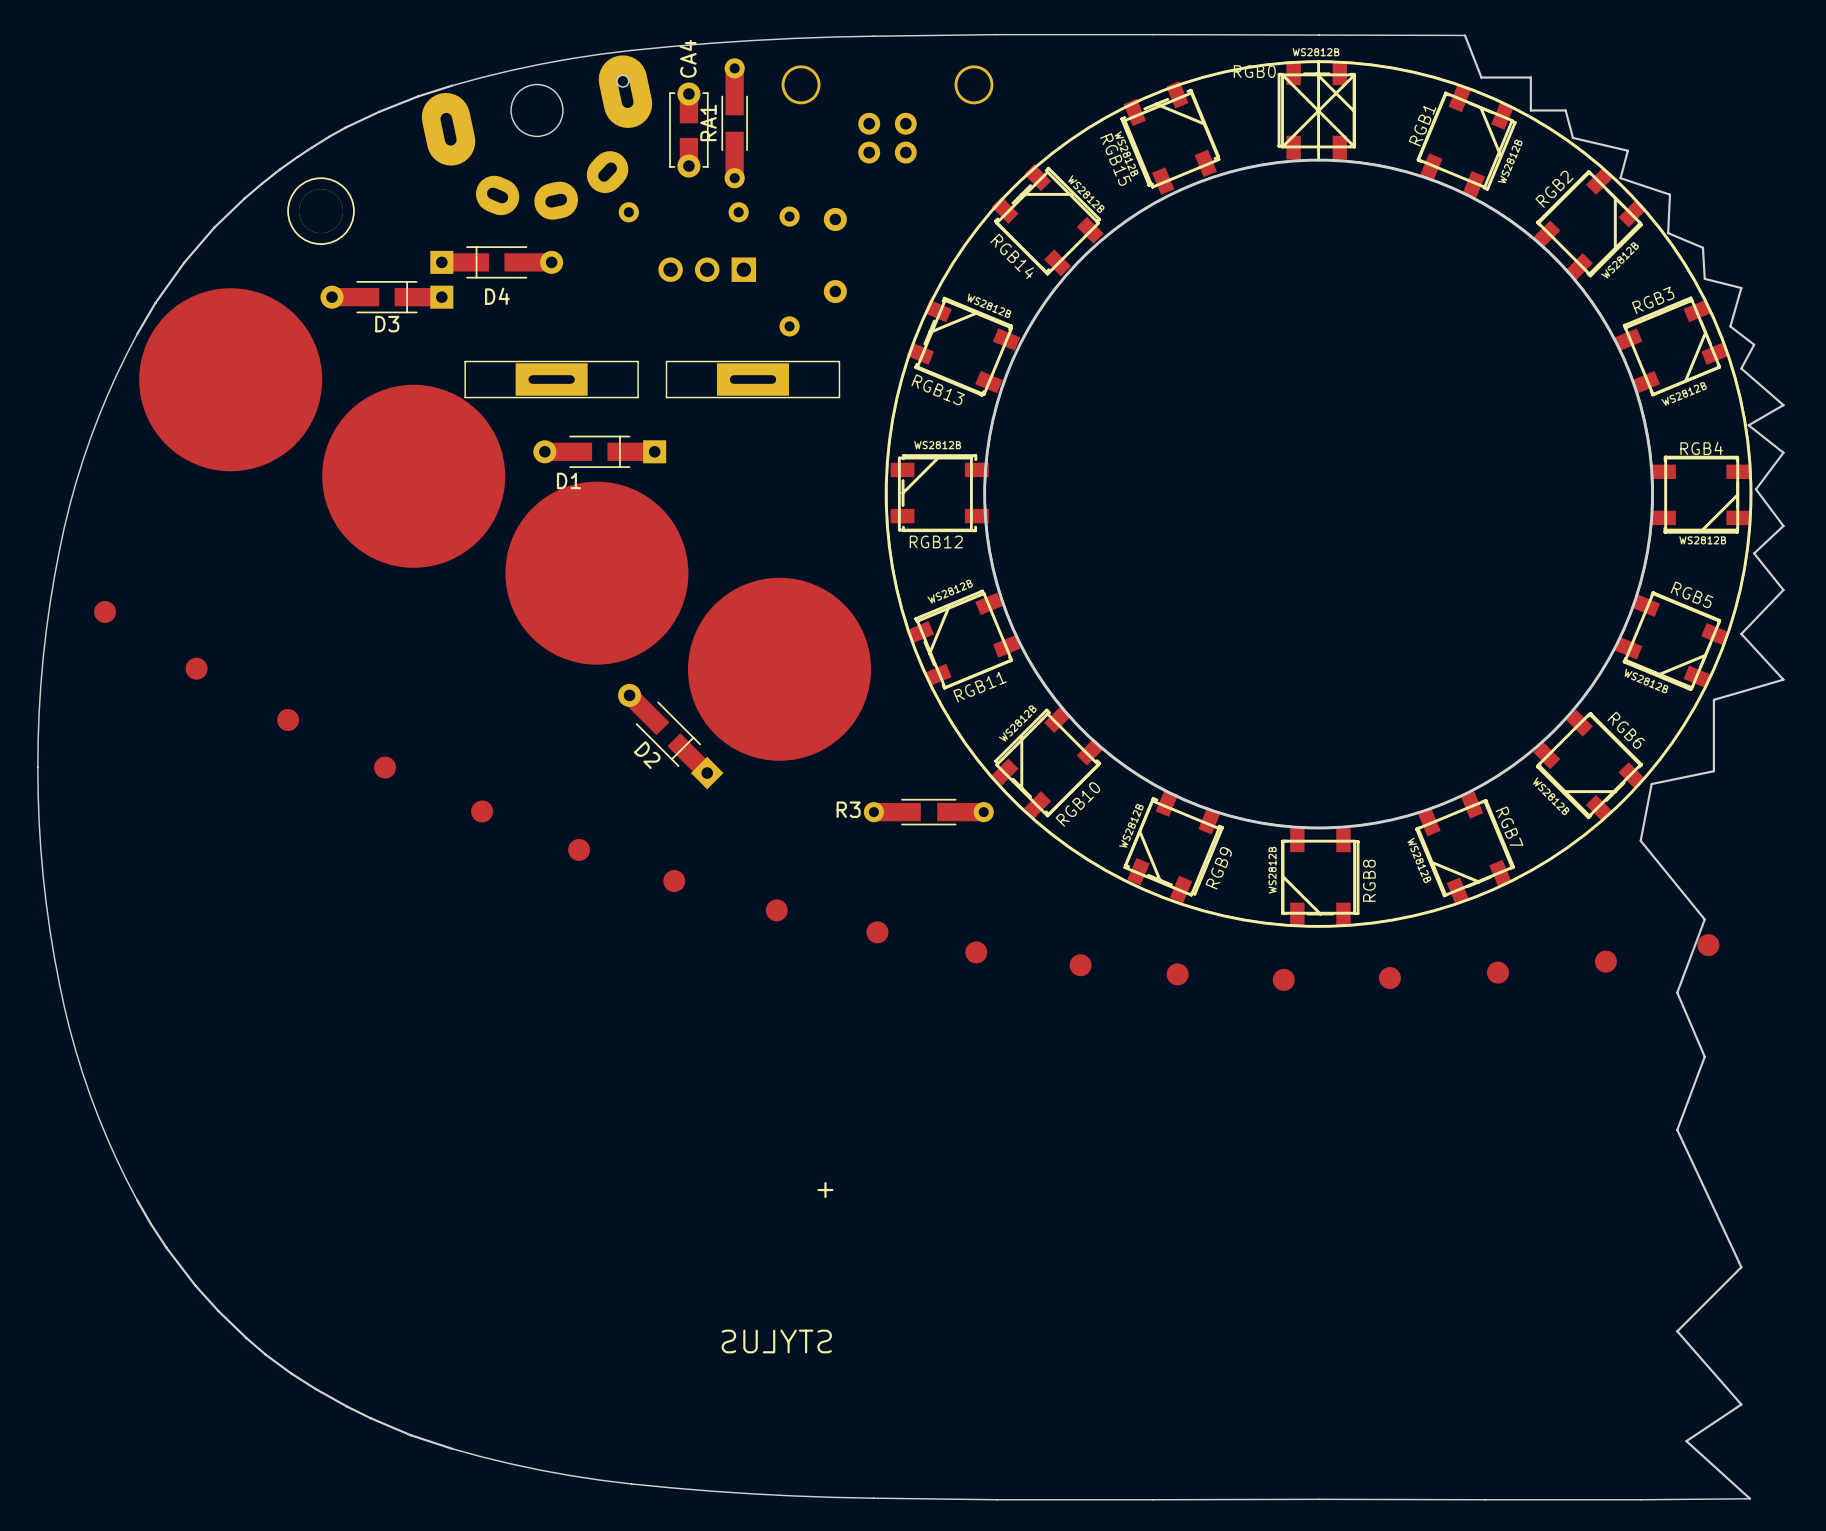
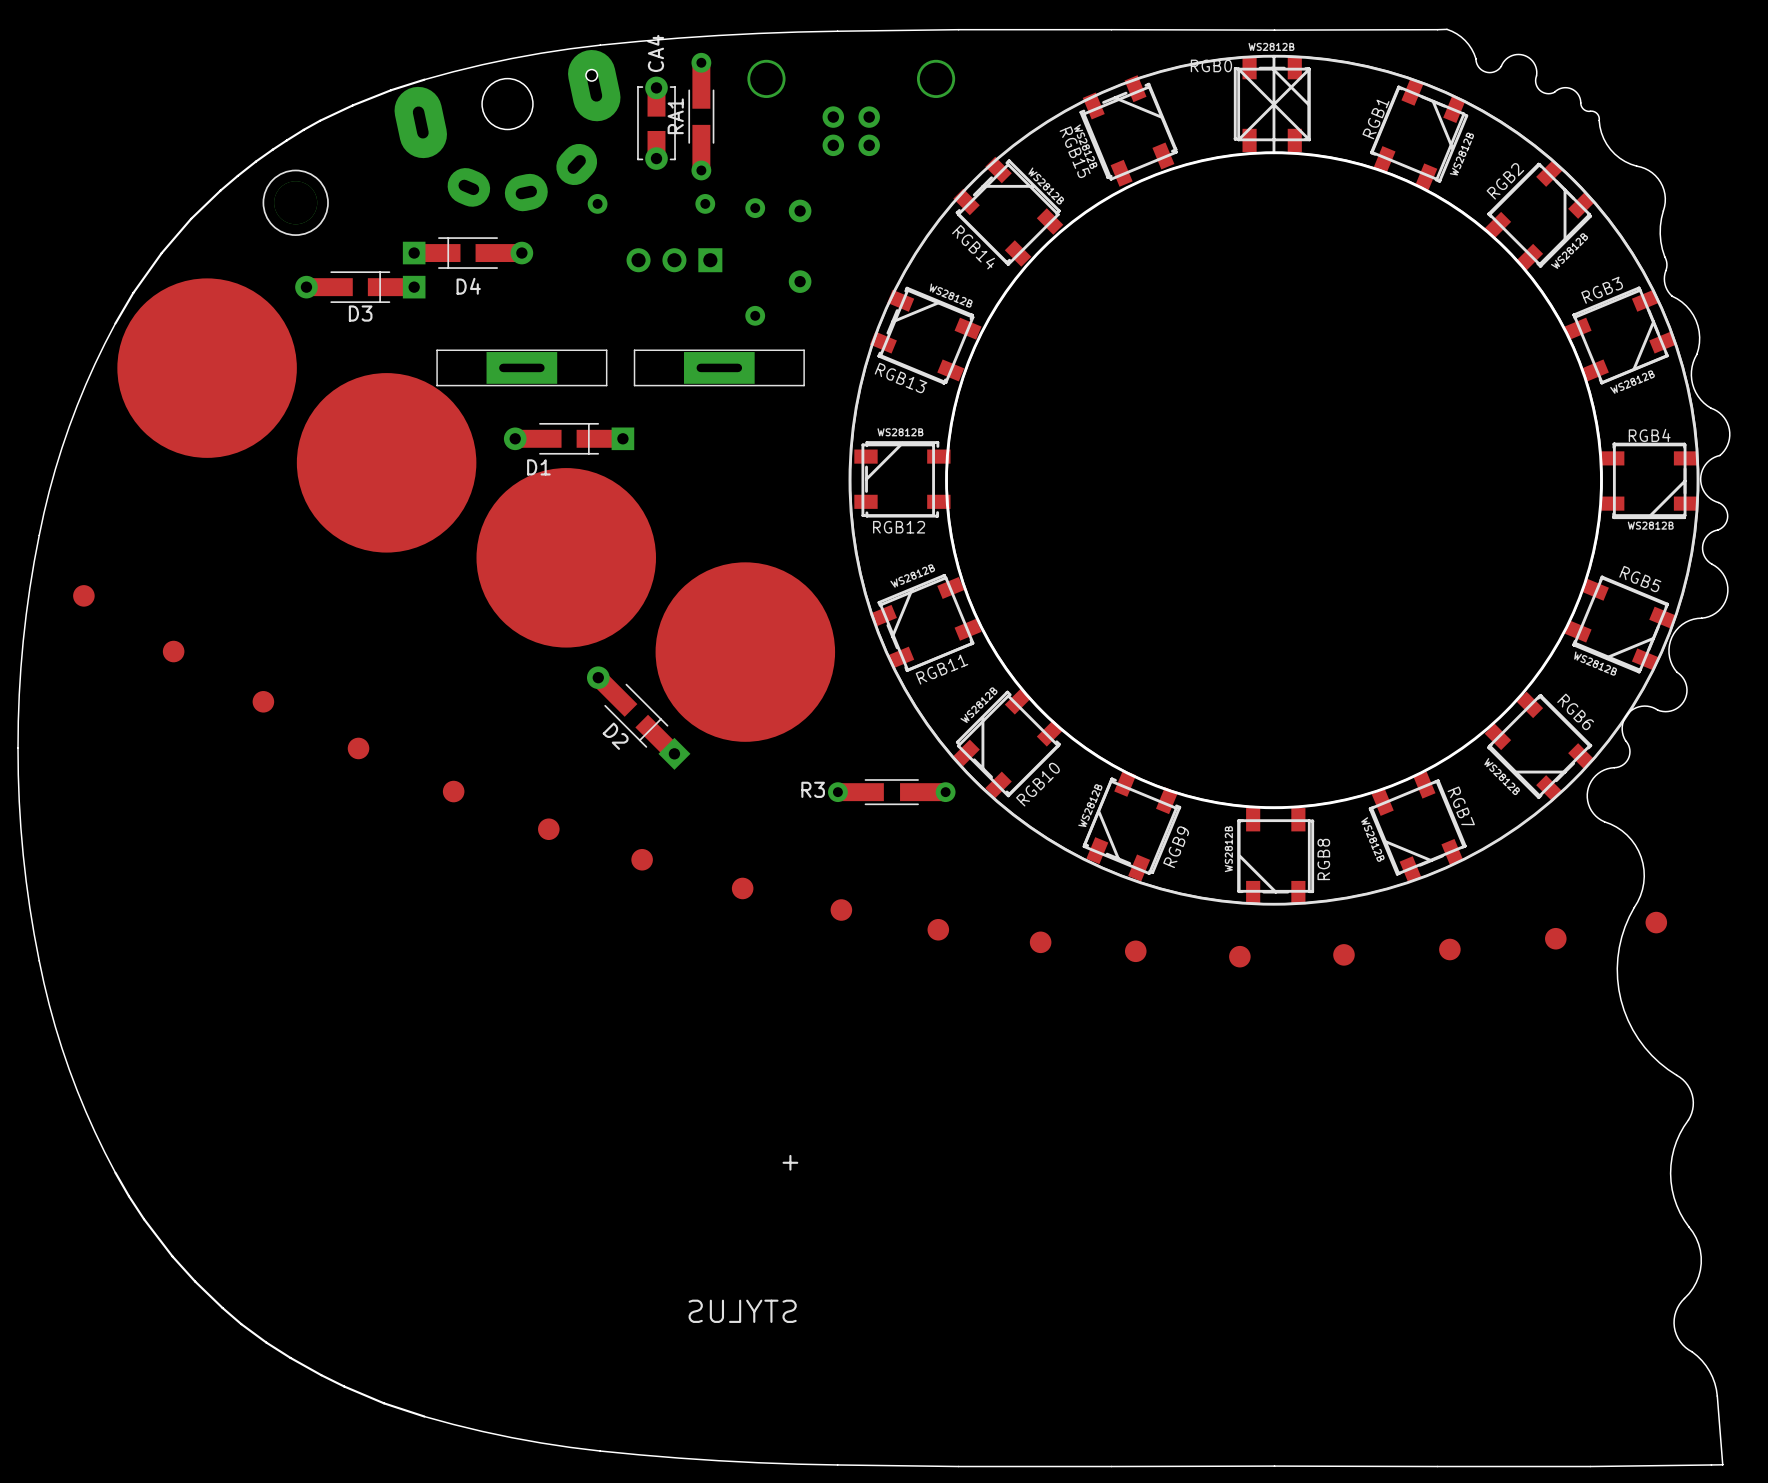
board edge: (1319, 35) (1464, 35) (1481, 77) (1530, 77) (1530, 110) (1565, 110) (1572, 137) (1627, 150) (1620, 178) (1669, 194) (1668, 233) (1702, 247) (1704, 278) (1741, 288) (1730, 326) (1754, 344) (1741, 368) (1783, 405) (1748, 425) (1783, 452) (1756, 489) (1783, 525) (1754, 553) (1783, 590) (1741, 633) (1783, 679) (1713, 699) (1713, 771) (1651, 784) (1640, 840) (1704, 919) (1677, 992) (1704, 1056) (1677, 1129) (1741, 1267) (1677, 1331) (1741, 1404) (1686, 1441) (1750, 1498) (1641, 1499) -> (1274, 30) (1447, 29) (1456, 33) (1468, 44) (1477, 65) (1482, 70) (1494, 71) (1510, 56) (1518, 54) (1525, 55) (1535, 64) (1535, 83) (1539, 90) (1548, 93) (1562, 87) (1571, 88) (1579, 96) (1582, 108) (1590, 111)
board edge: none -> (1590, 111) (1598, 115) (1603, 138) (1614, 154) (1625, 161) (1648, 170) (1658, 178) (1662, 186) (1665, 202) (1660, 233) (1666, 263) (1665, 284) (1670, 294) (1690, 310) (1697, 325) (1699, 343) (1691, 371) (1694, 388) (1703, 403) (1724, 417) (1729, 432) (1726, 448) (1719, 455) (1707, 462) (1702, 469) (1700, 478) (1701, 487) (1706, 494) (1722, 505) (1727, 512) (1724, 524) (1708, 535) (1702, 547) (1706, 559) (1718, 568) (1724, 576) (1727, 587) (1726, 598) (1715, 613) (1685, 622) (1679, 627) (1671, 637) (1668, 649) (1670, 661) (1684, 679) (1686, 687) (1683, 702) (1670, 711) (1662, 711) (1644, 706) (1636, 707) (1629, 712) (1624, 719) (1622, 727) (1623, 735) (1629, 749) (1627, 759) (1620, 766) (1607, 768) (1598, 773) (1589, 784) (1587, 794) (1588, 804) (1593, 813) (1627, 835) (1635, 845) (1642, 863) (1644, 876) (1642, 889) (1625, 926) (1617, 957) (1618, 989) (1624, 1010) (1632, 1029) (1644, 1047) (1659, 1062) (1682, 1079) (1692, 1095) (1691, 1113) (1673, 1149) (1670, 1165) (1671, 1181) (1676, 1205) (1698, 1243) (1701, 1263) (1696, 1282) (1677, 1307) (1674, 1323) (1680, 1341) (1701, 1360) (1714, 1383) (1722, 1464)
board edge: none -> (1722, 1464) (1590, 1466)

